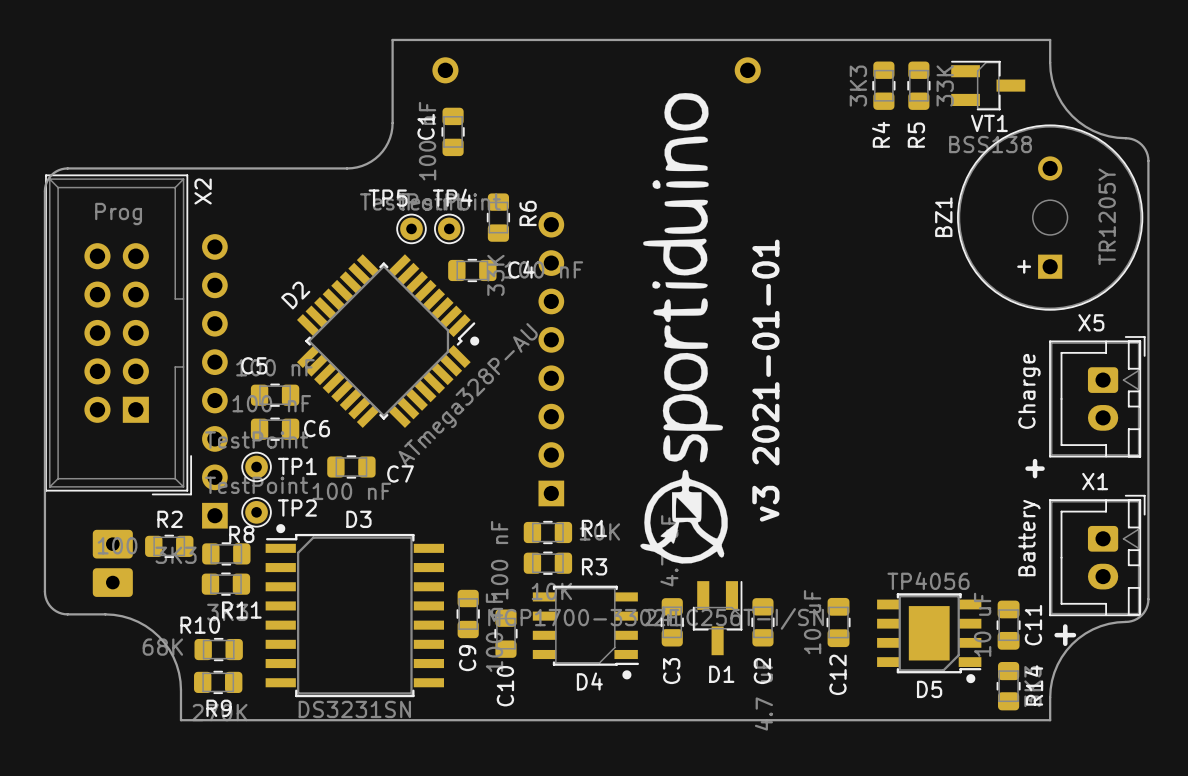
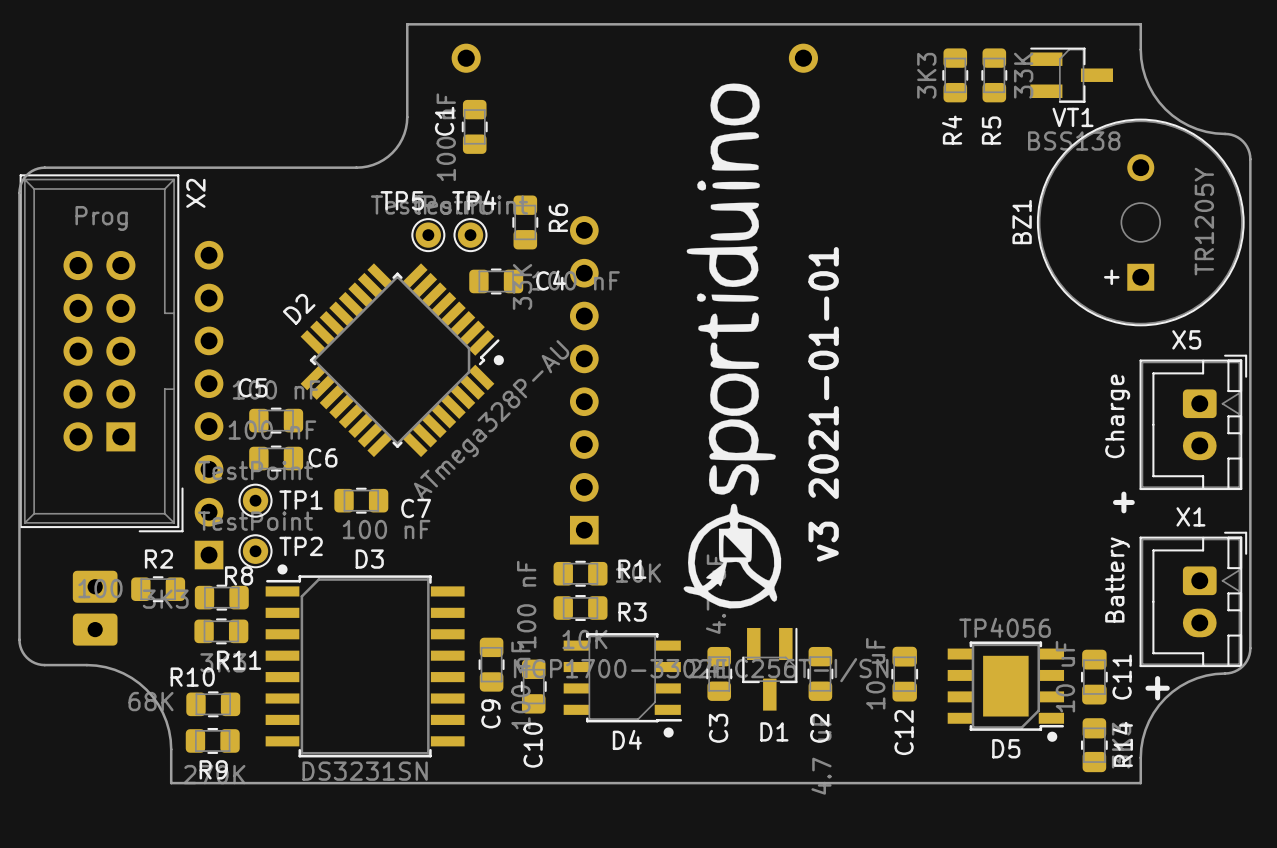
C7 value position: 100 nF (351, 491) -> 100 nF (386, 529)

